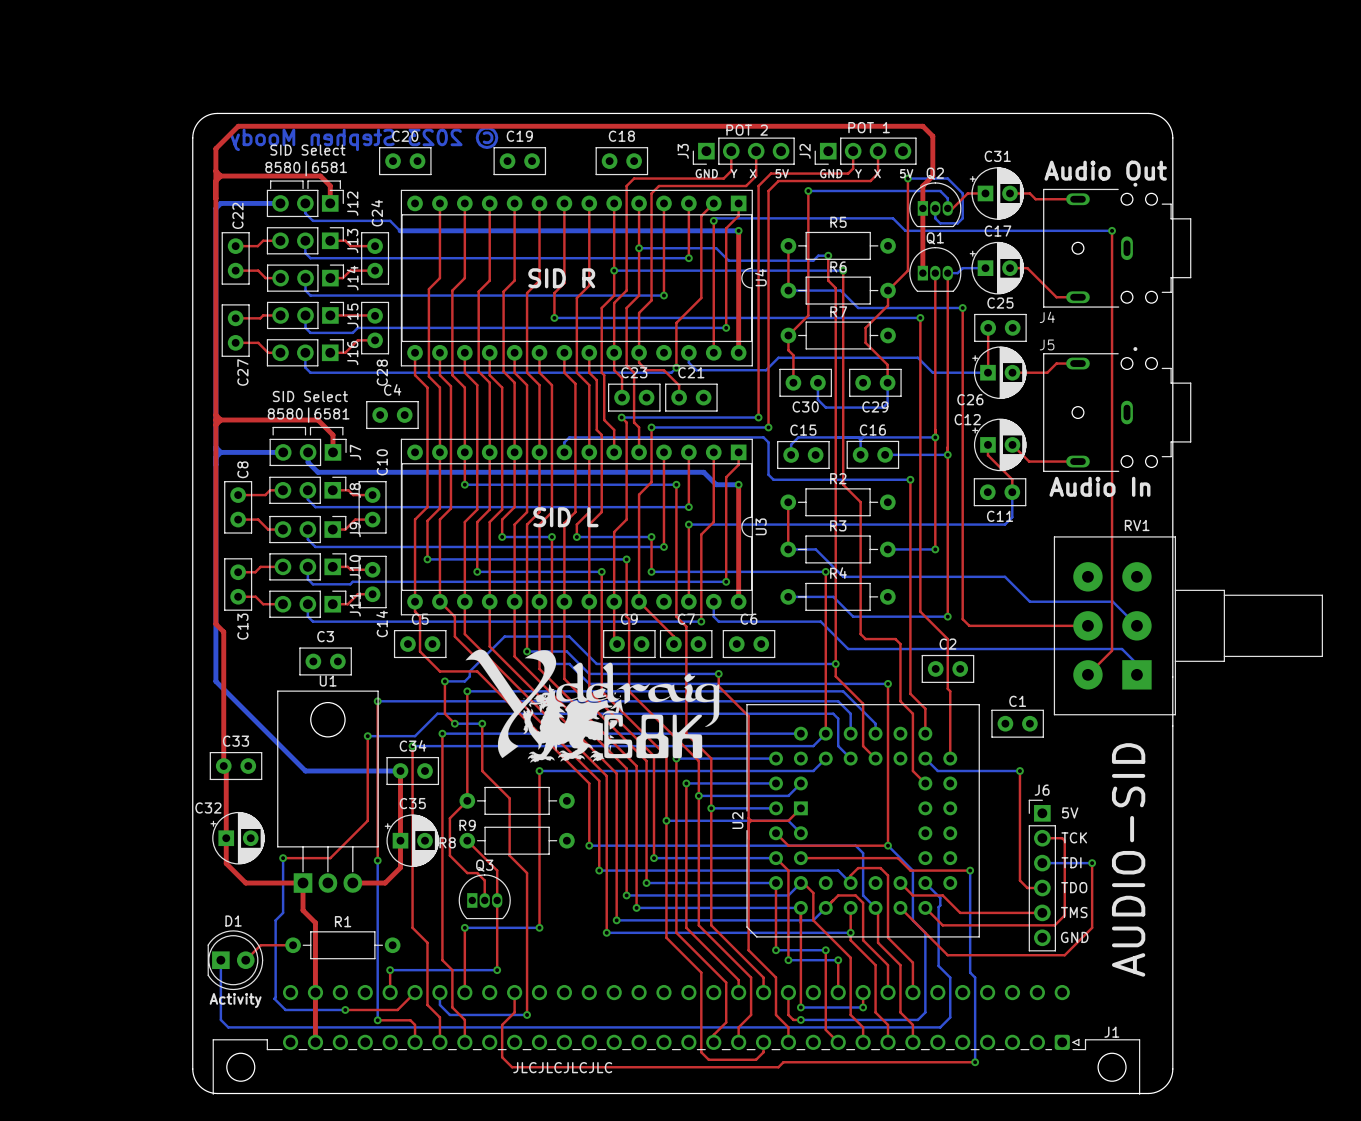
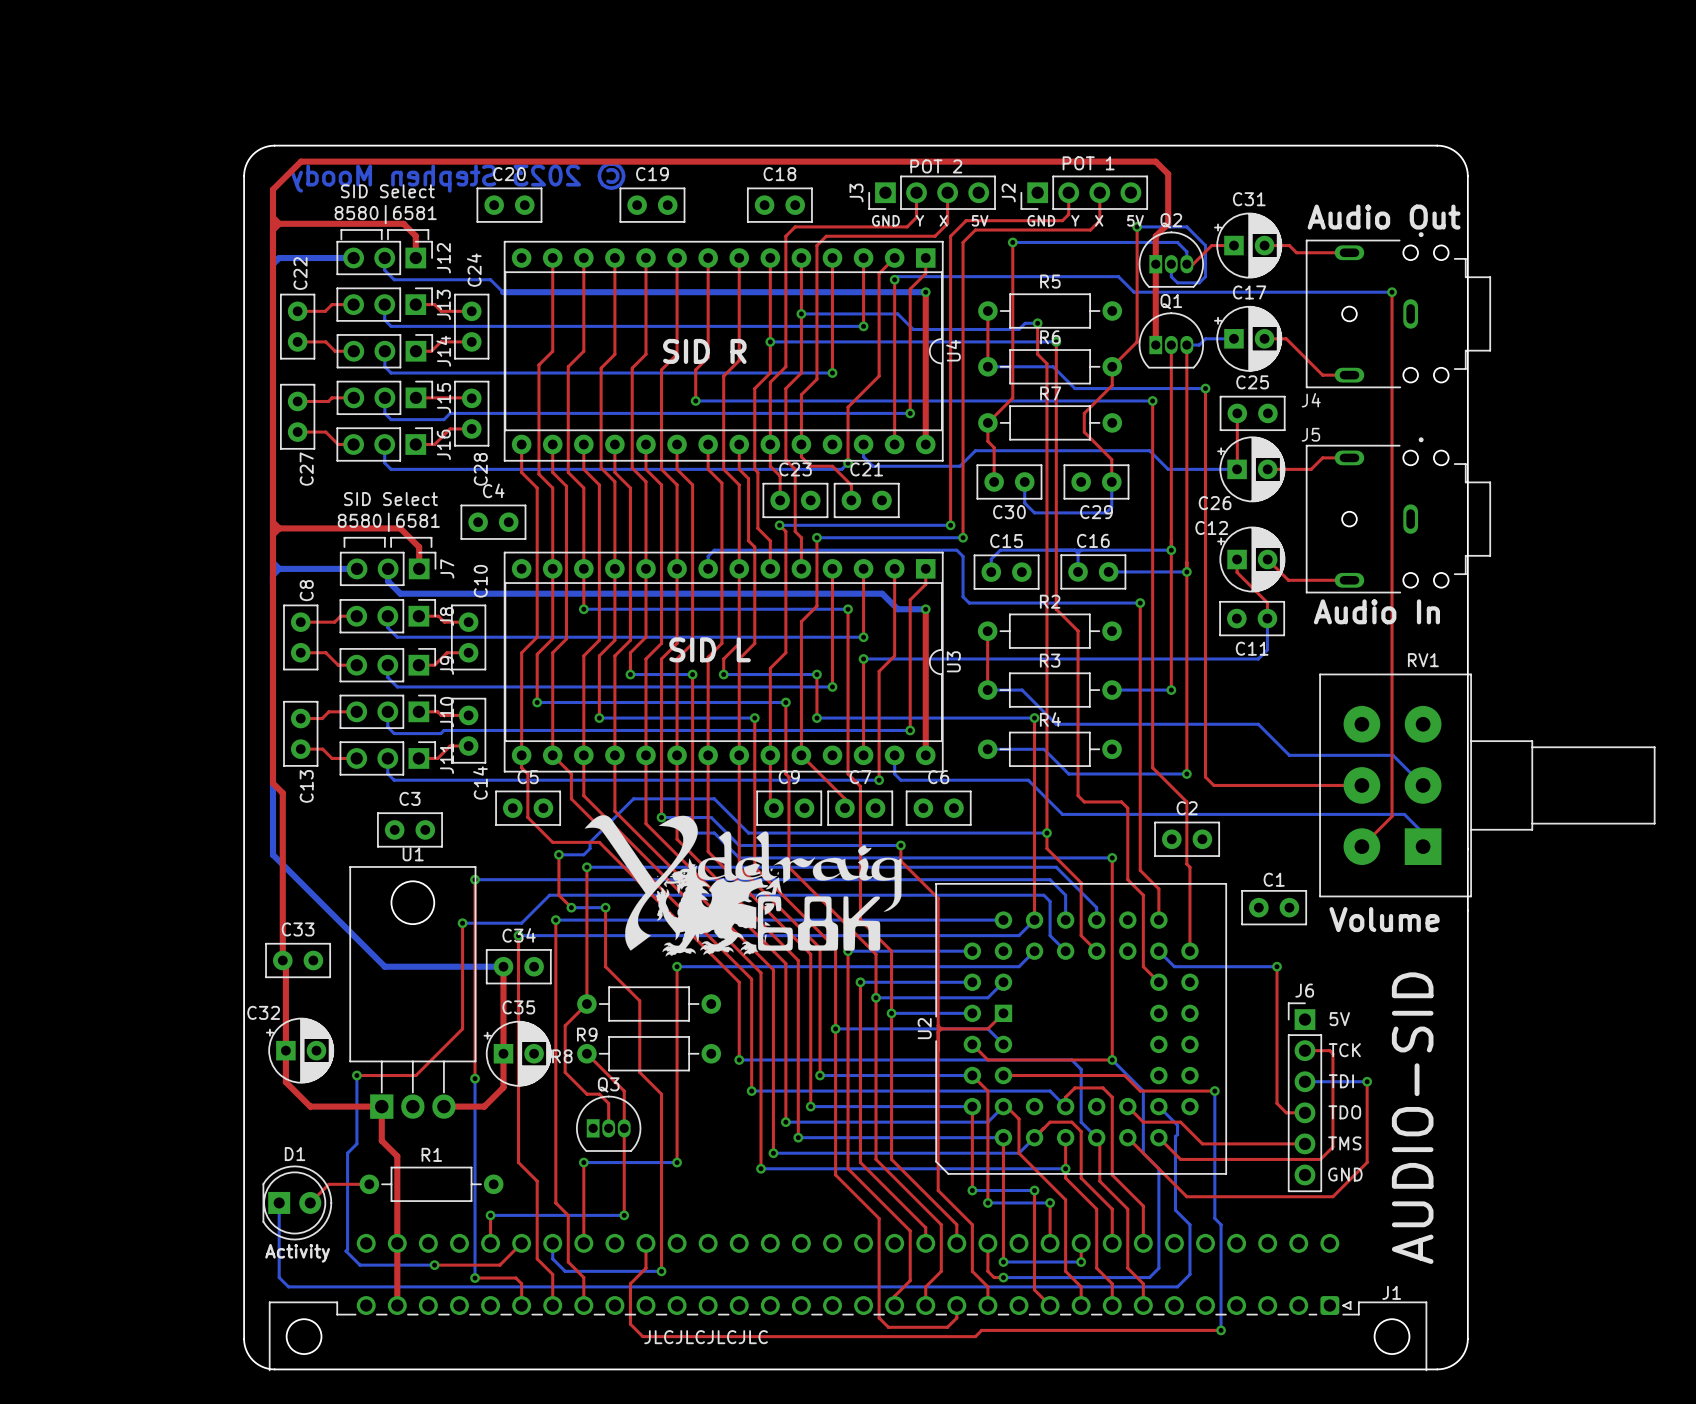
text: none -> Volume (1384, 919)
text position: AUDIO-SID (1128, 859) -> AUDIO-SID (1412, 1118)

